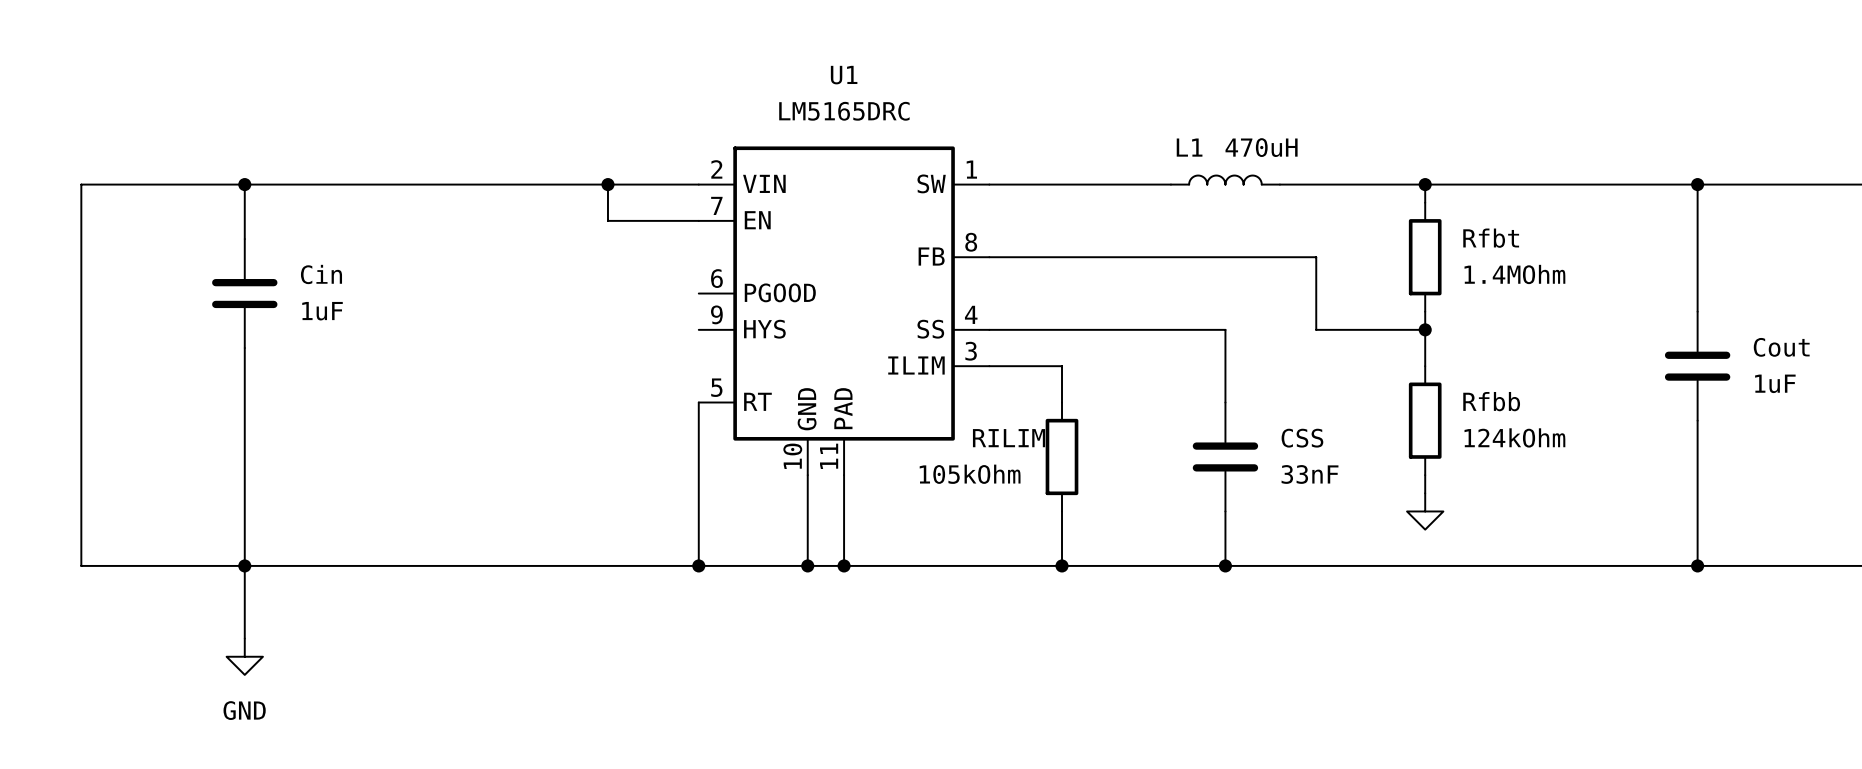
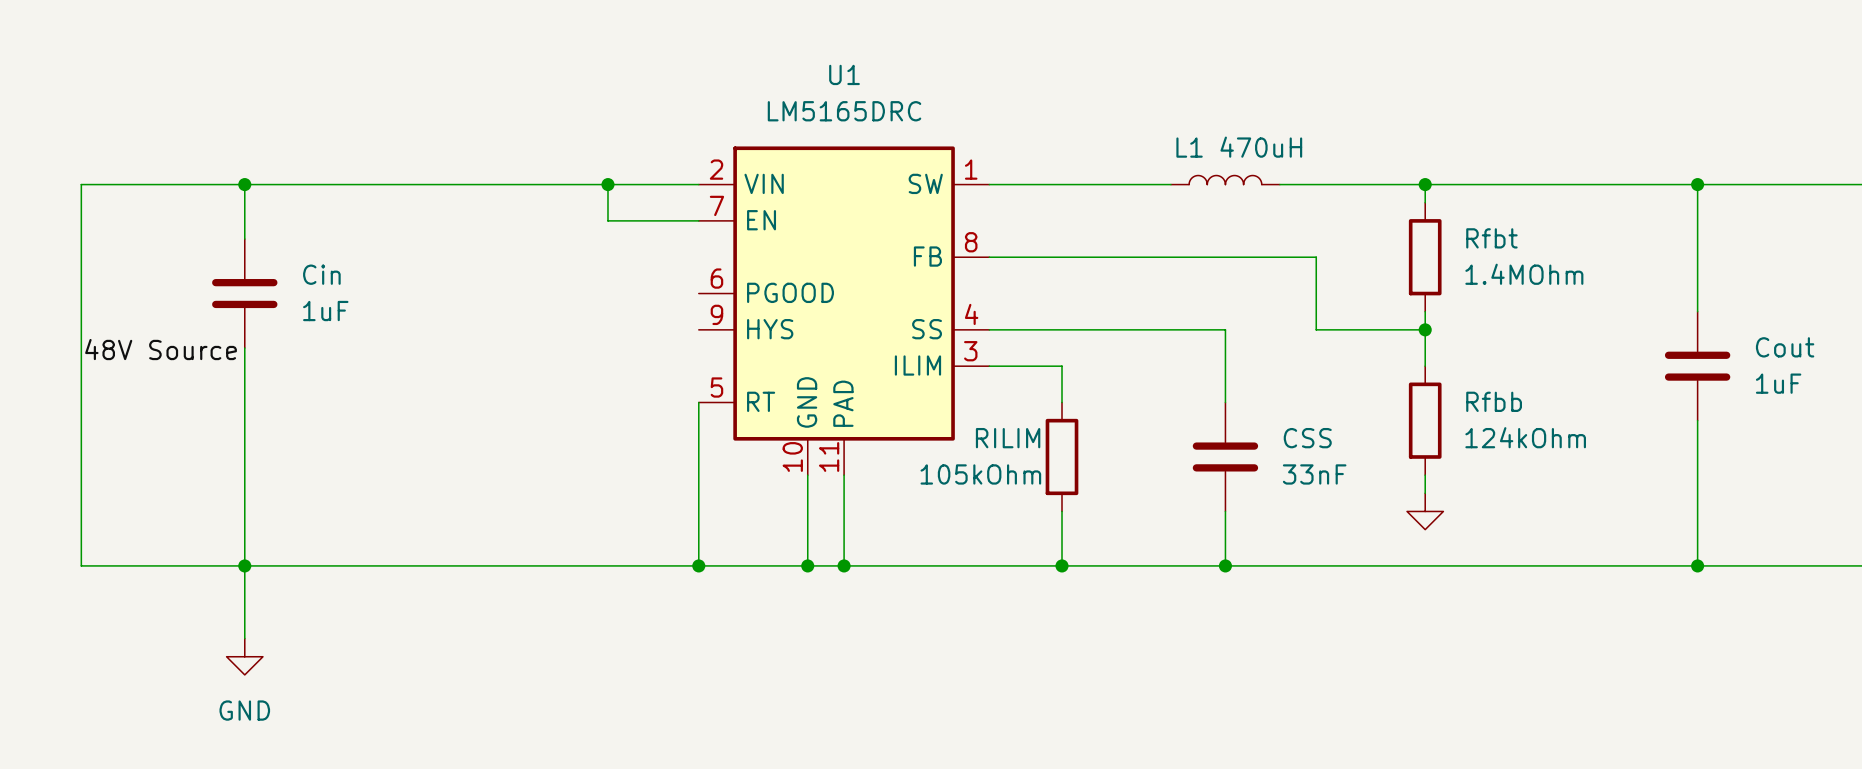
label: none -> 48V Source (161, 349)

